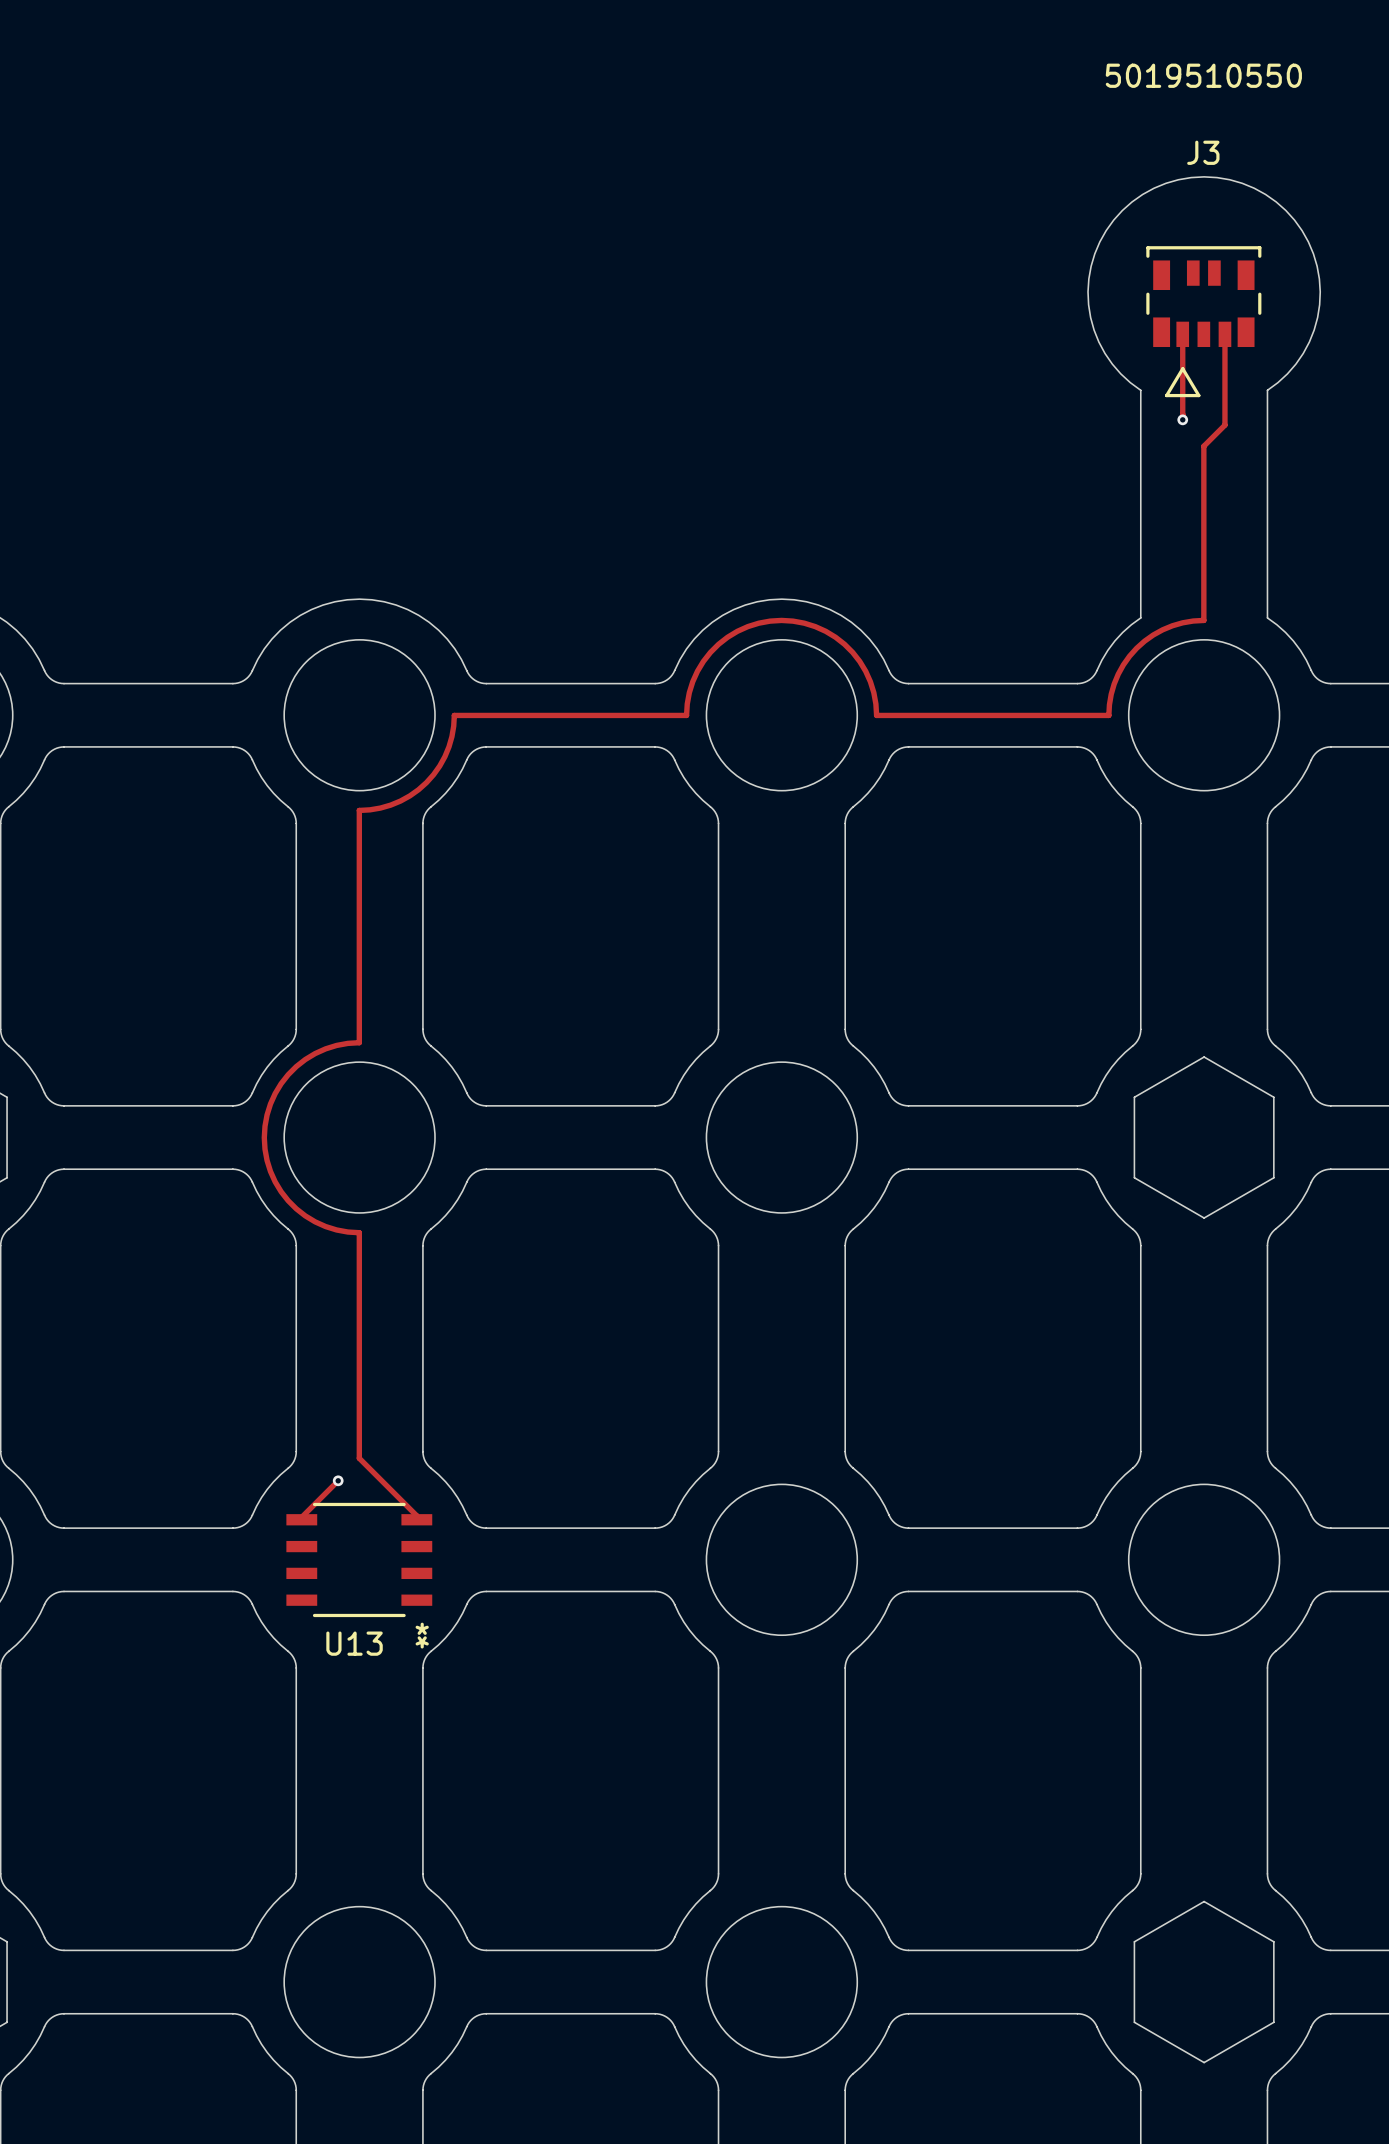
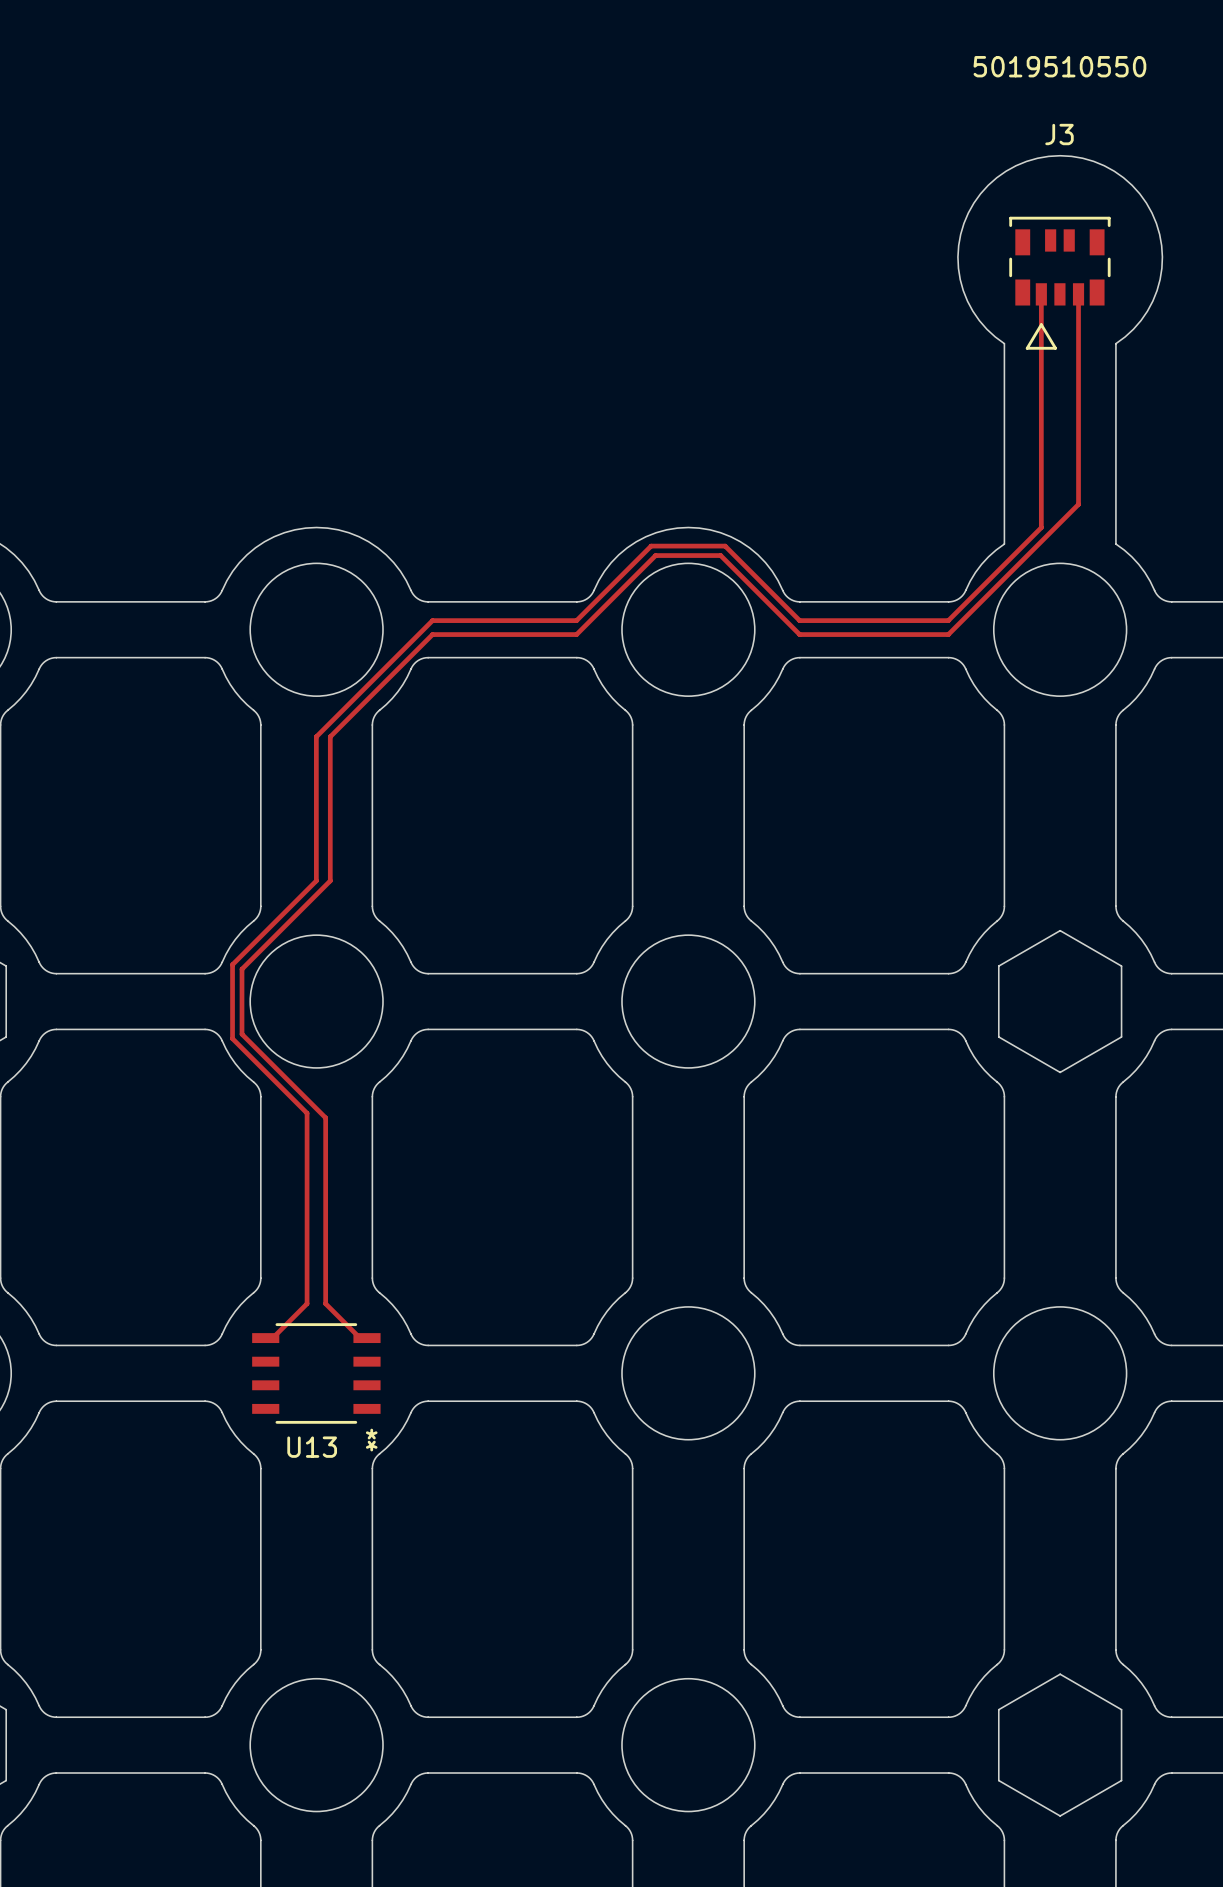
via: (1182, 419) -> none
track: (1224, 425) (1203, 446) (1203, 620) (1182, 622) (1162, 629) (1136, 648) (1118, 674) (1111, 694) (1108, 715) (876, 715) (870, 681) (859, 661) (844, 644) (815, 626) (793, 621) (770, 621) (737, 631) (710, 652) (692, 681) (686, 715) (454, 715) (448, 746) (433, 774) (418, 789) (400, 801) (380, 808) (359, 810) (359, 836) -> (1041, 369) (1041, 527) (948, 620) (799, 620) (725, 546) (651, 546) (576, 620) (432, 620) (316, 736)
track: none -> (1078, 374) (1078, 504) (948, 634) (799, 634) (720, 555) (655, 555) (576, 634) (432, 634) (330, 736) (330, 880) (242, 969) (242, 1034) (325, 1117) (325, 1303) (359, 1338) (367, 1338)
track: (359, 1000) (359, 1042) (325, 1048) (305, 1059) (288, 1074) (270, 1104) (265, 1126) (265, 1149) (275, 1181) (296, 1208) (325, 1226) (359, 1232) (359, 1458) (416, 1515) (416, 1519) -> (316, 880) (232, 964) (232, 1038) (307, 1113) (307, 1303) (272, 1338) (265, 1338)
track: (338, 1480) (301, 1517) (301, 1519) -> none
via: (338, 1480) -> none

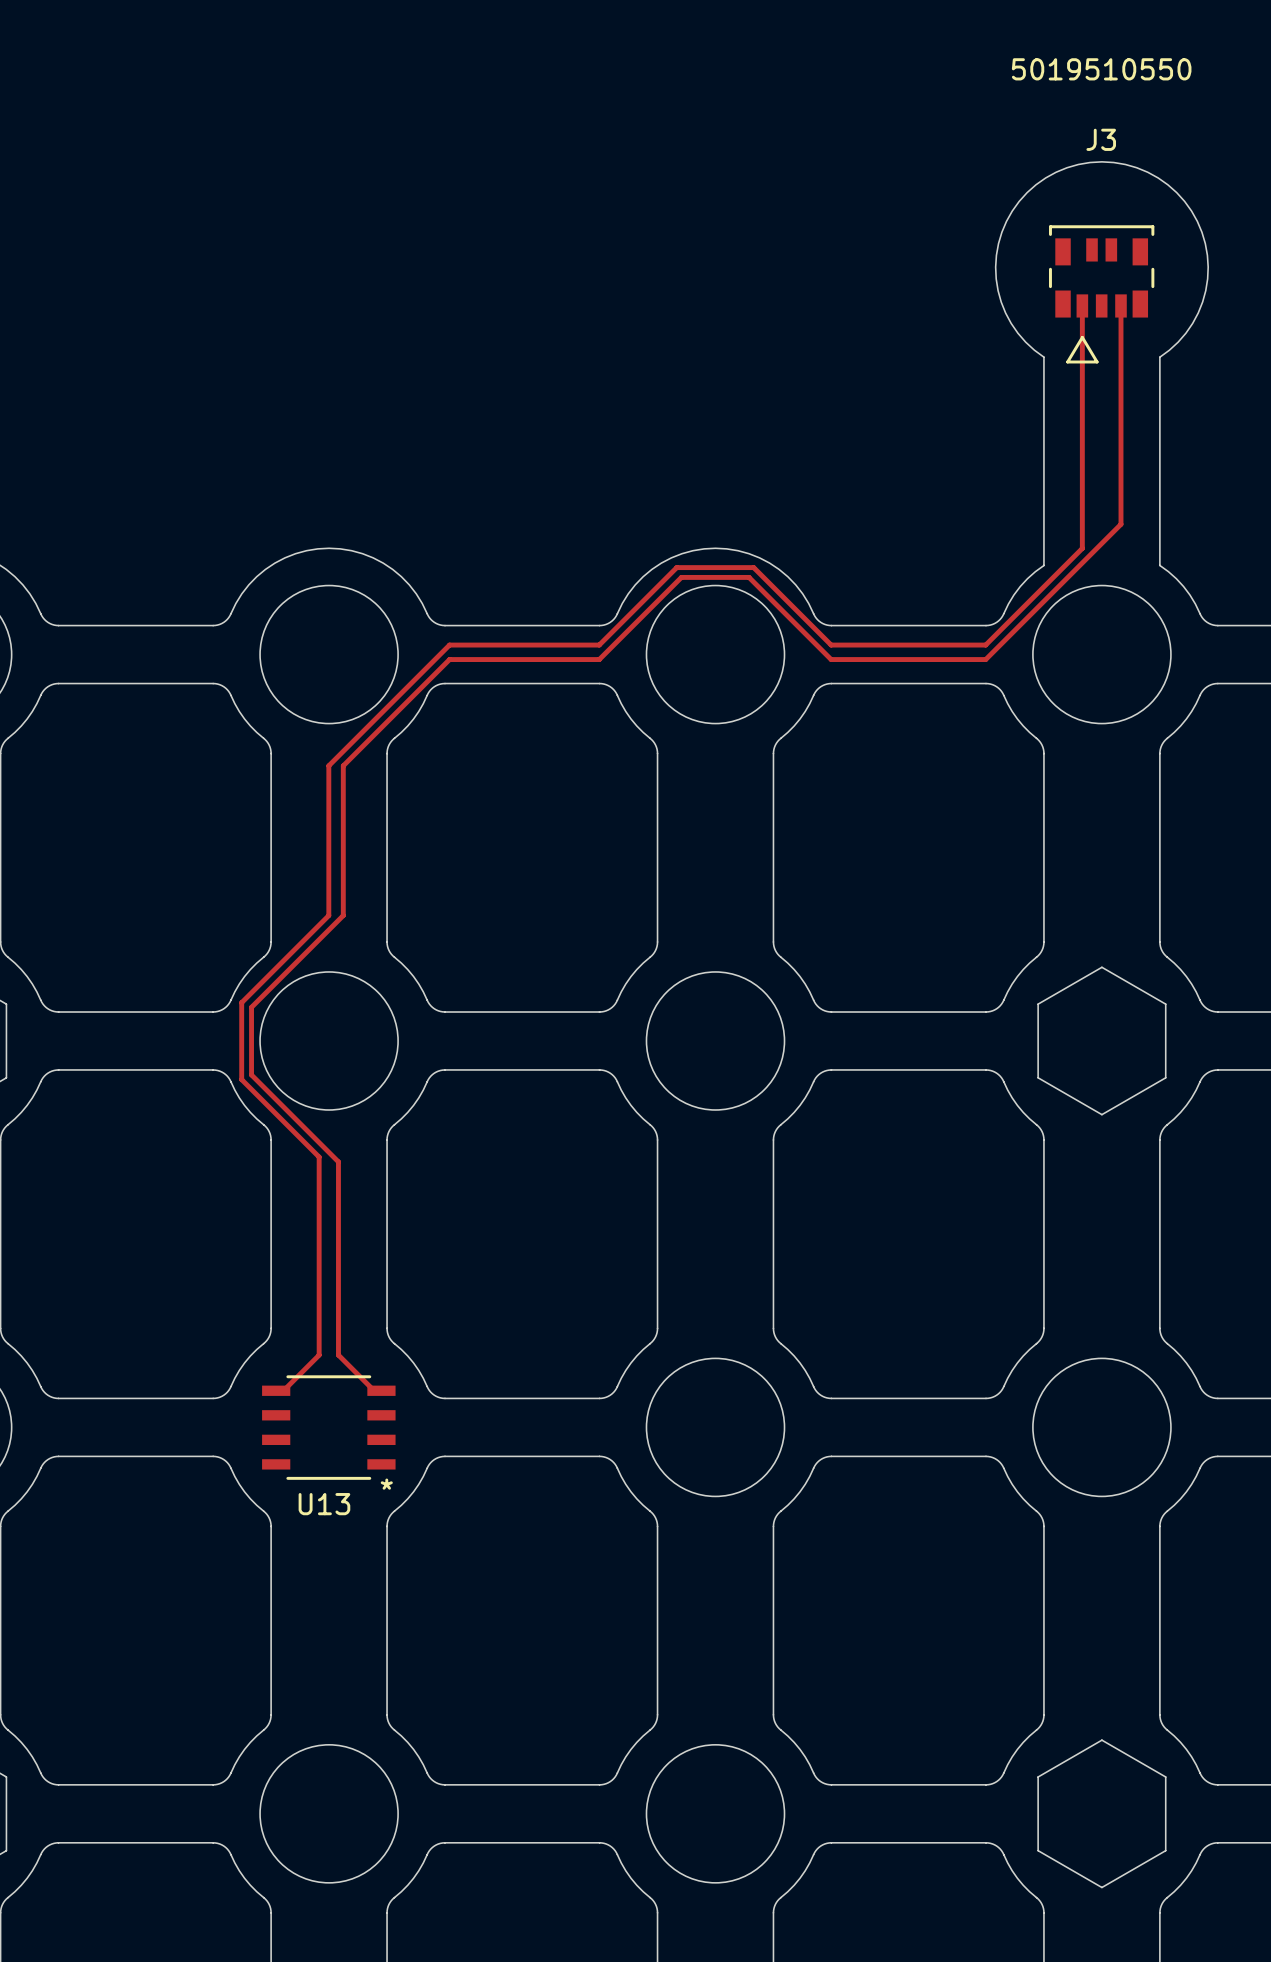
U13 footprint: [252, 1323, 381, 1424] -> [262, 1375, 396, 1480]

